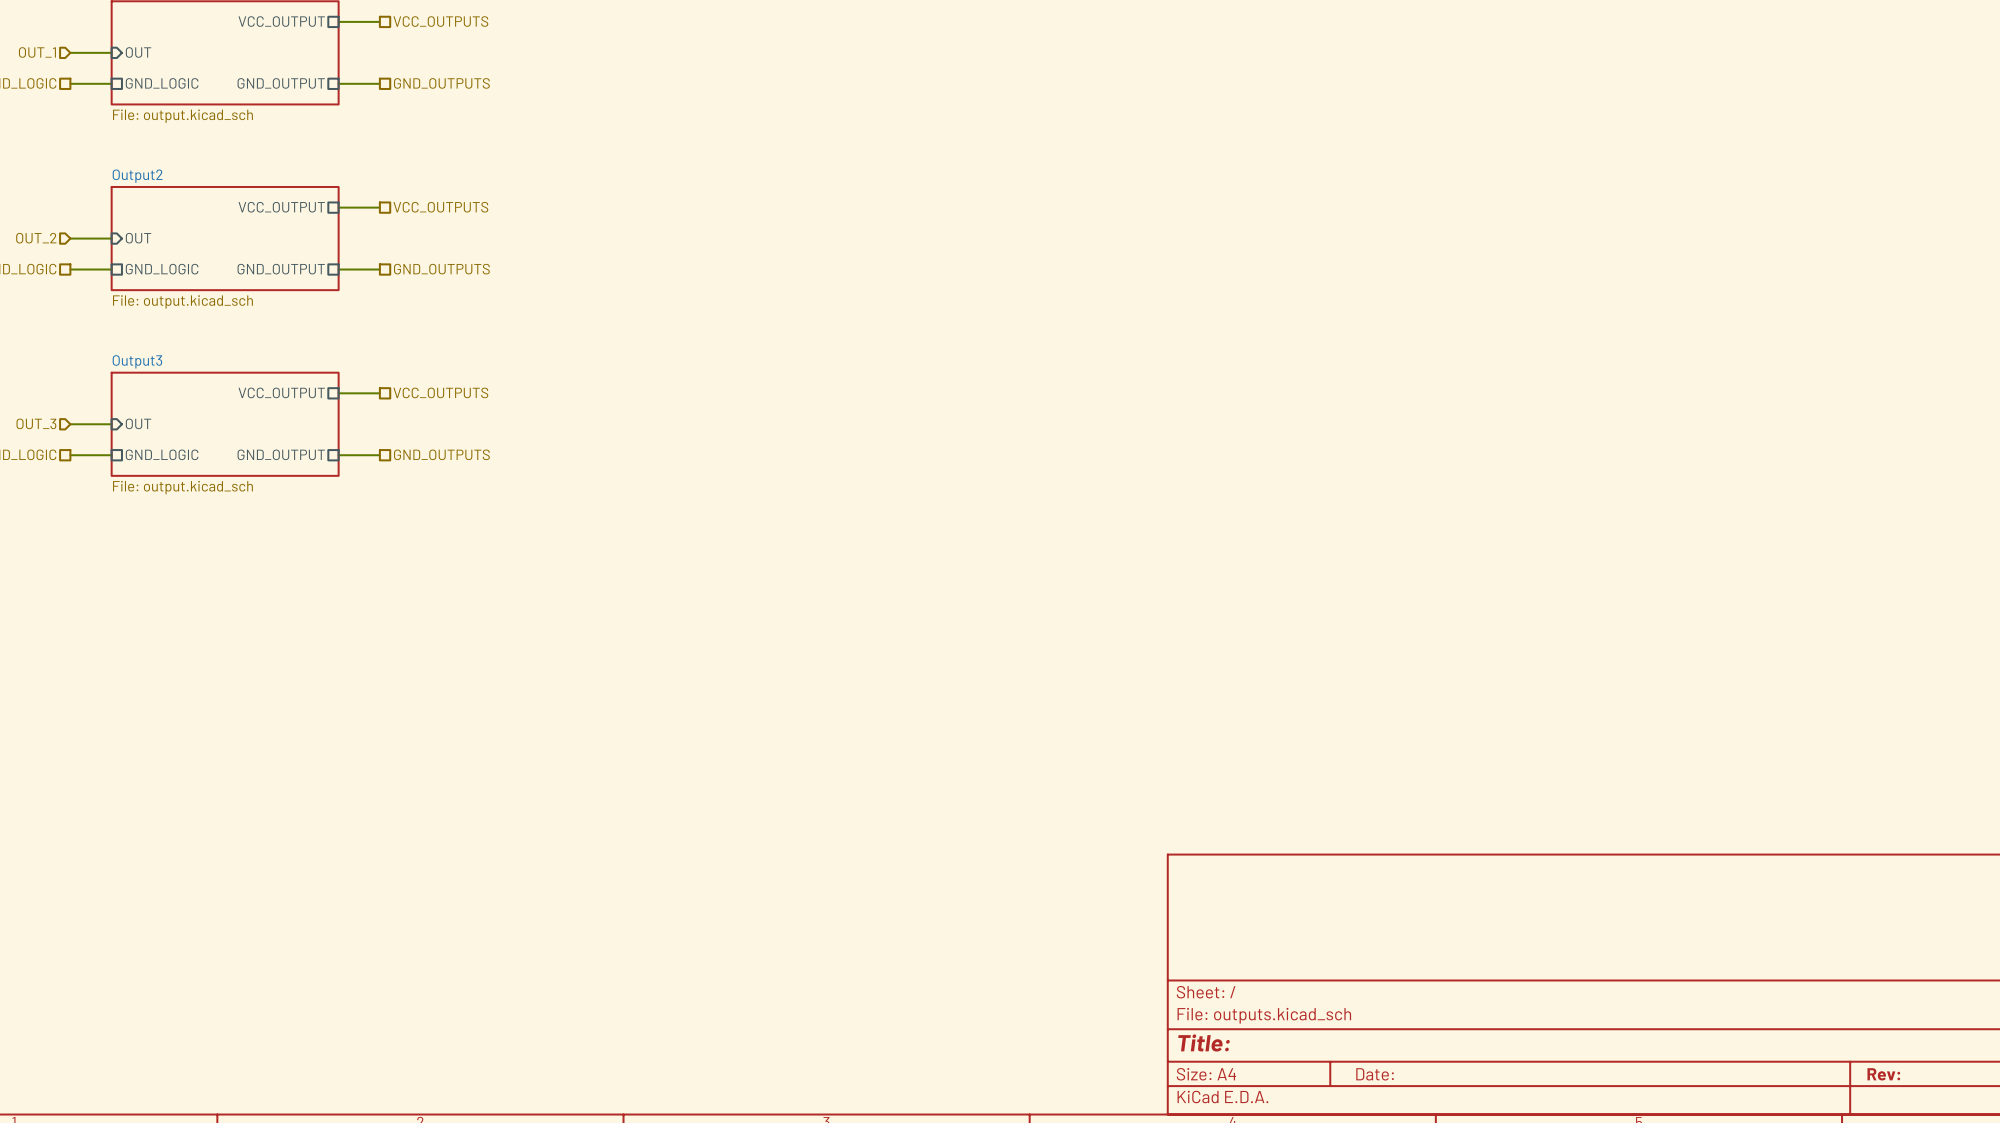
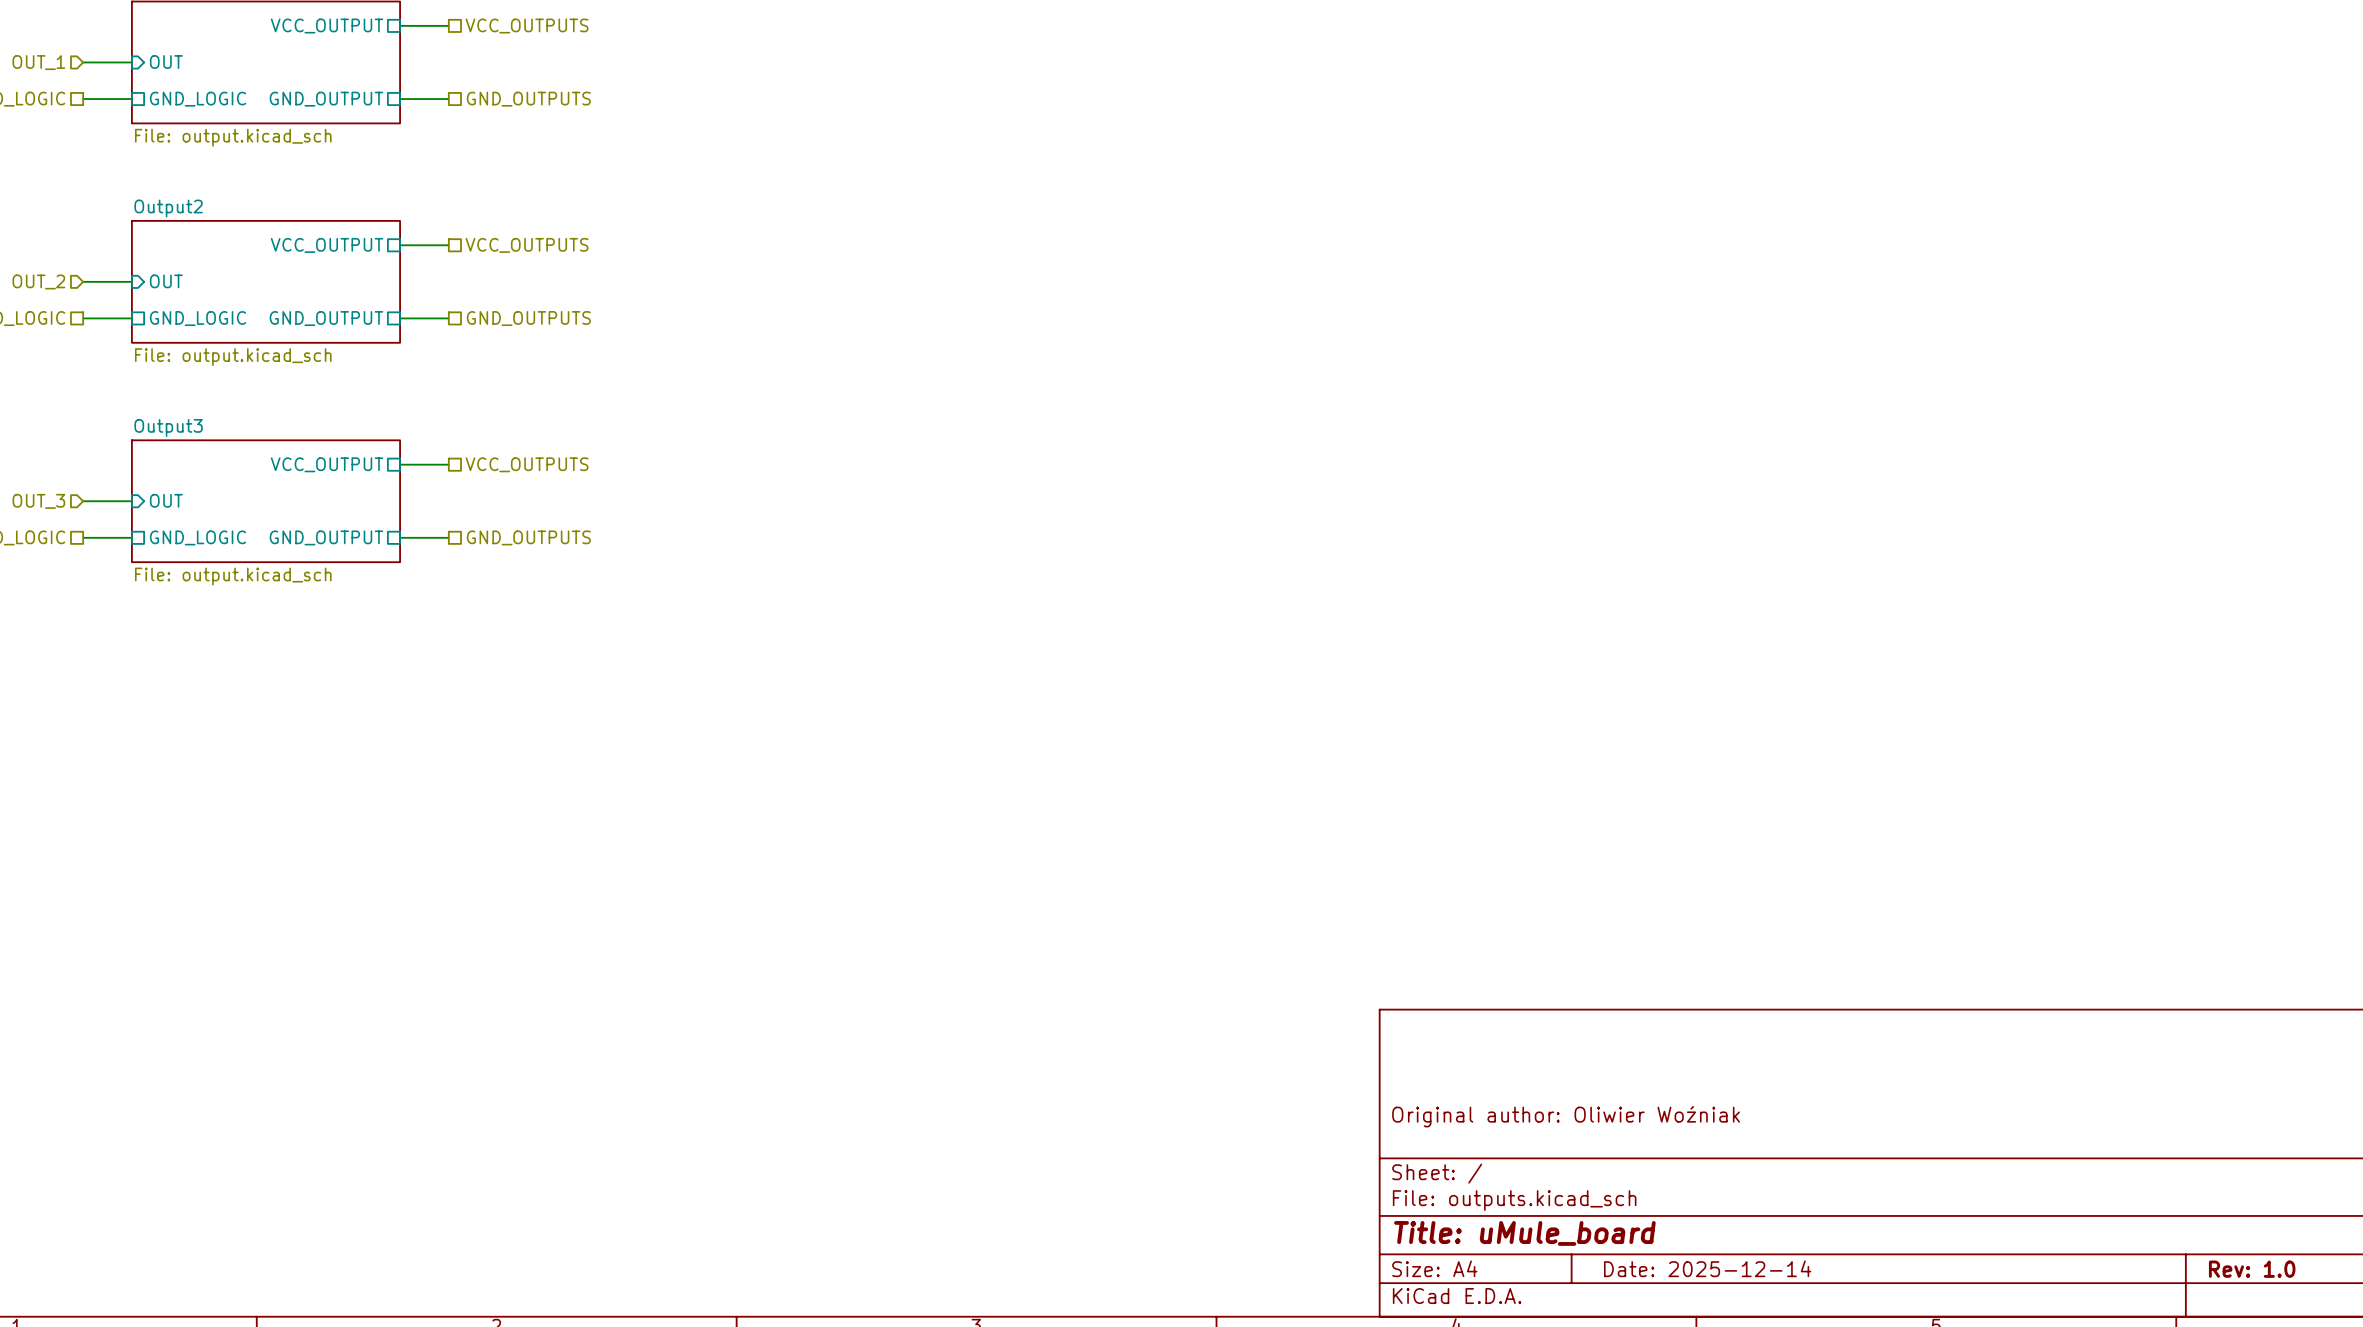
title block: none -> Original author: Oliwier Woźniak (1566, 1116)
title block: Title: (1204, 1042) -> Title: uMule_board (1524, 1233)
title block: Date: (1375, 1074) -> Date: 2025-12-14 (1707, 1268)
title block: Rev: (1883, 1074) -> Rev: 1.0 (2252, 1269)

